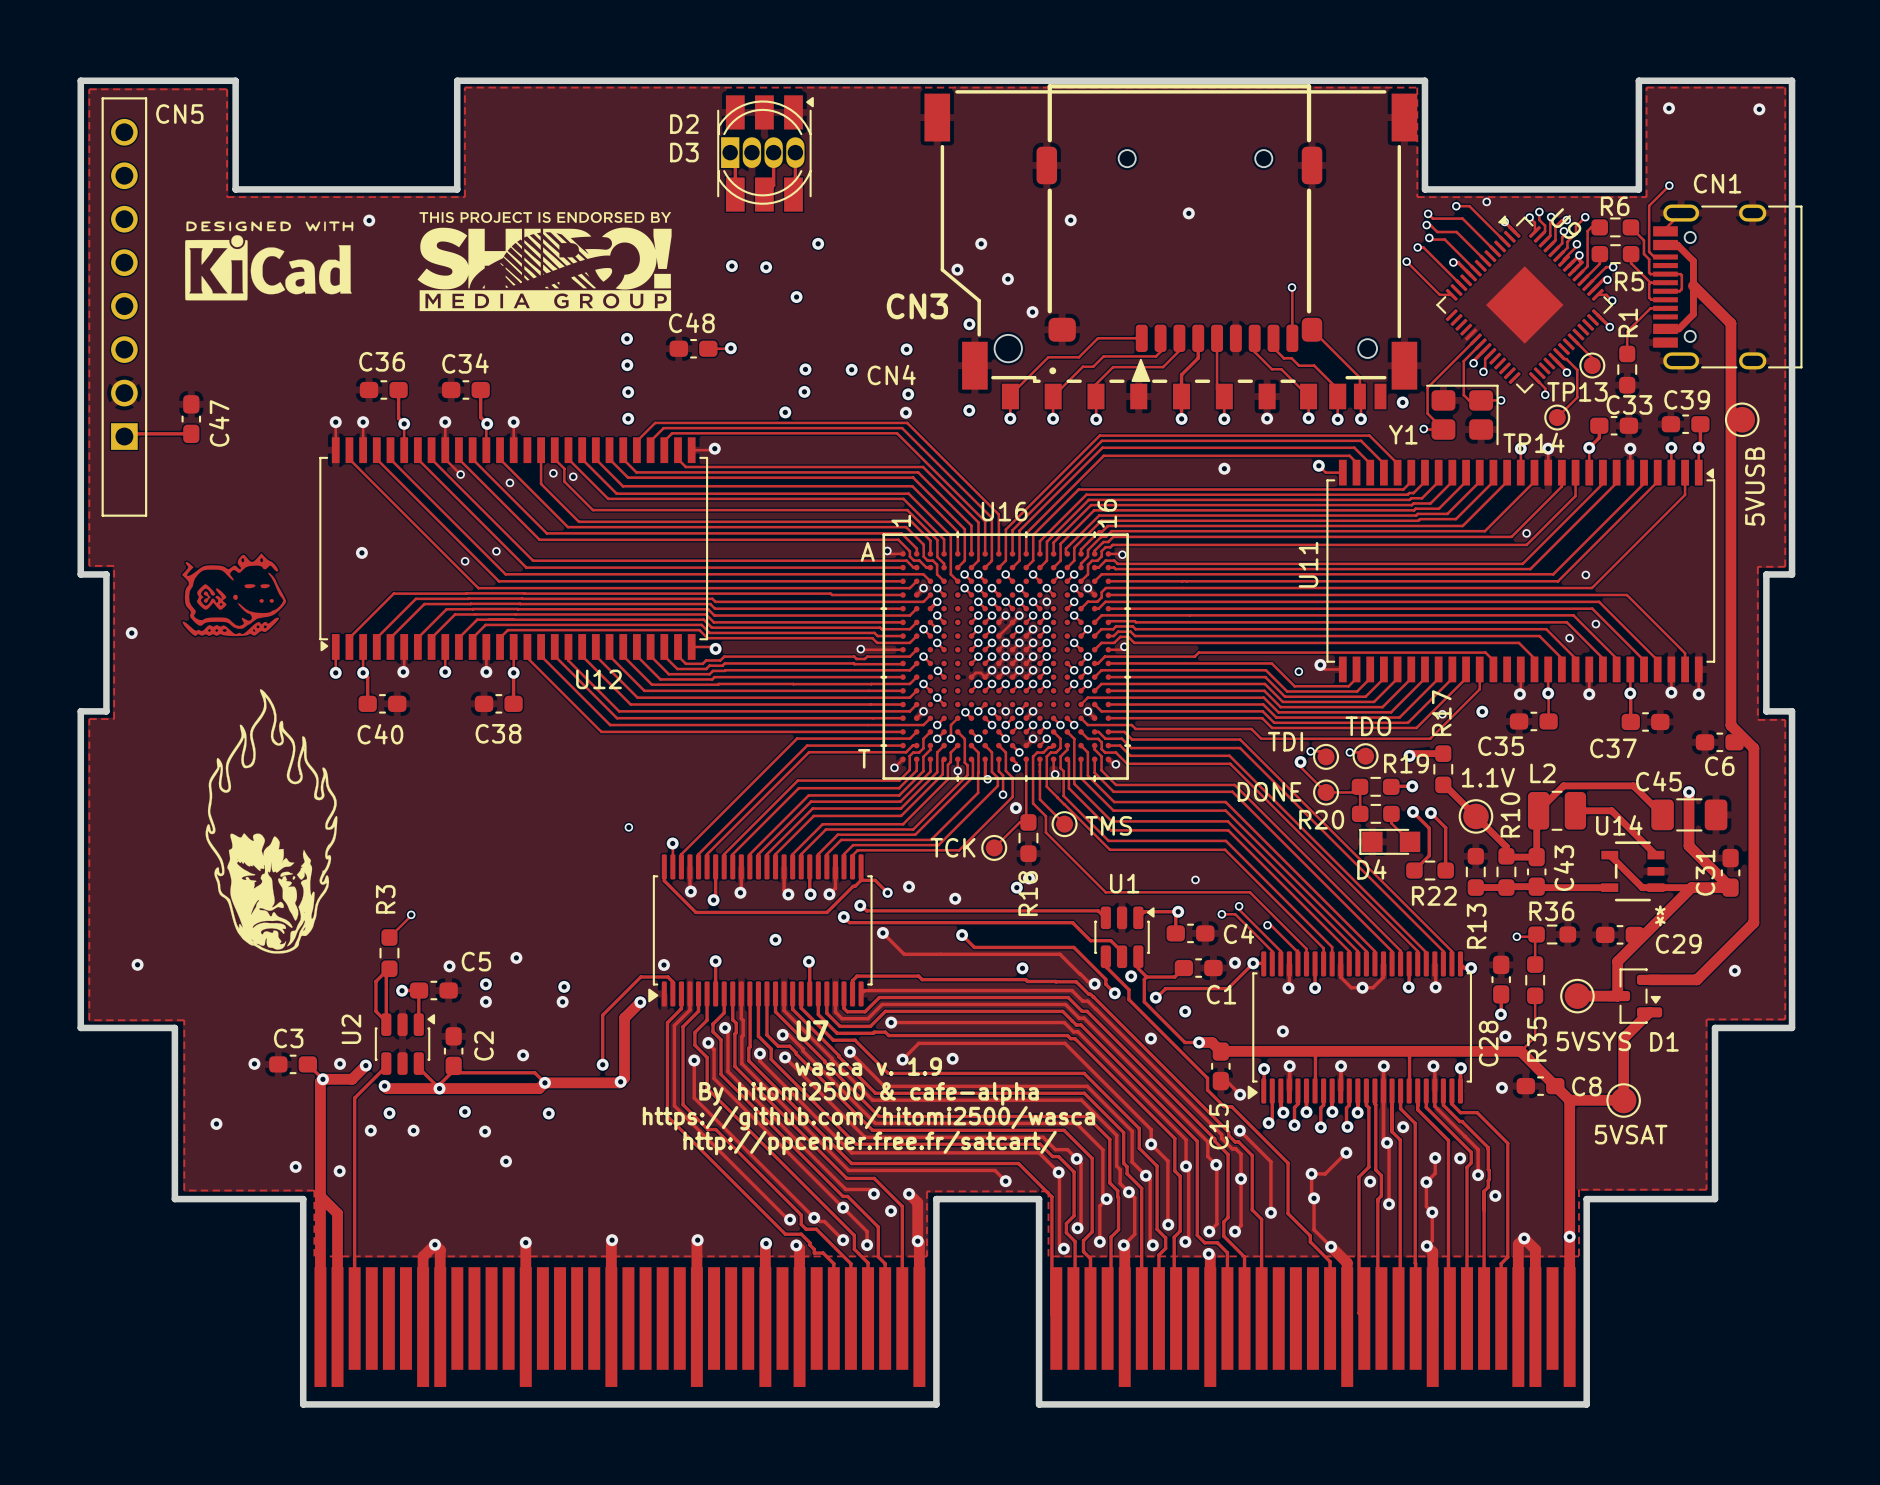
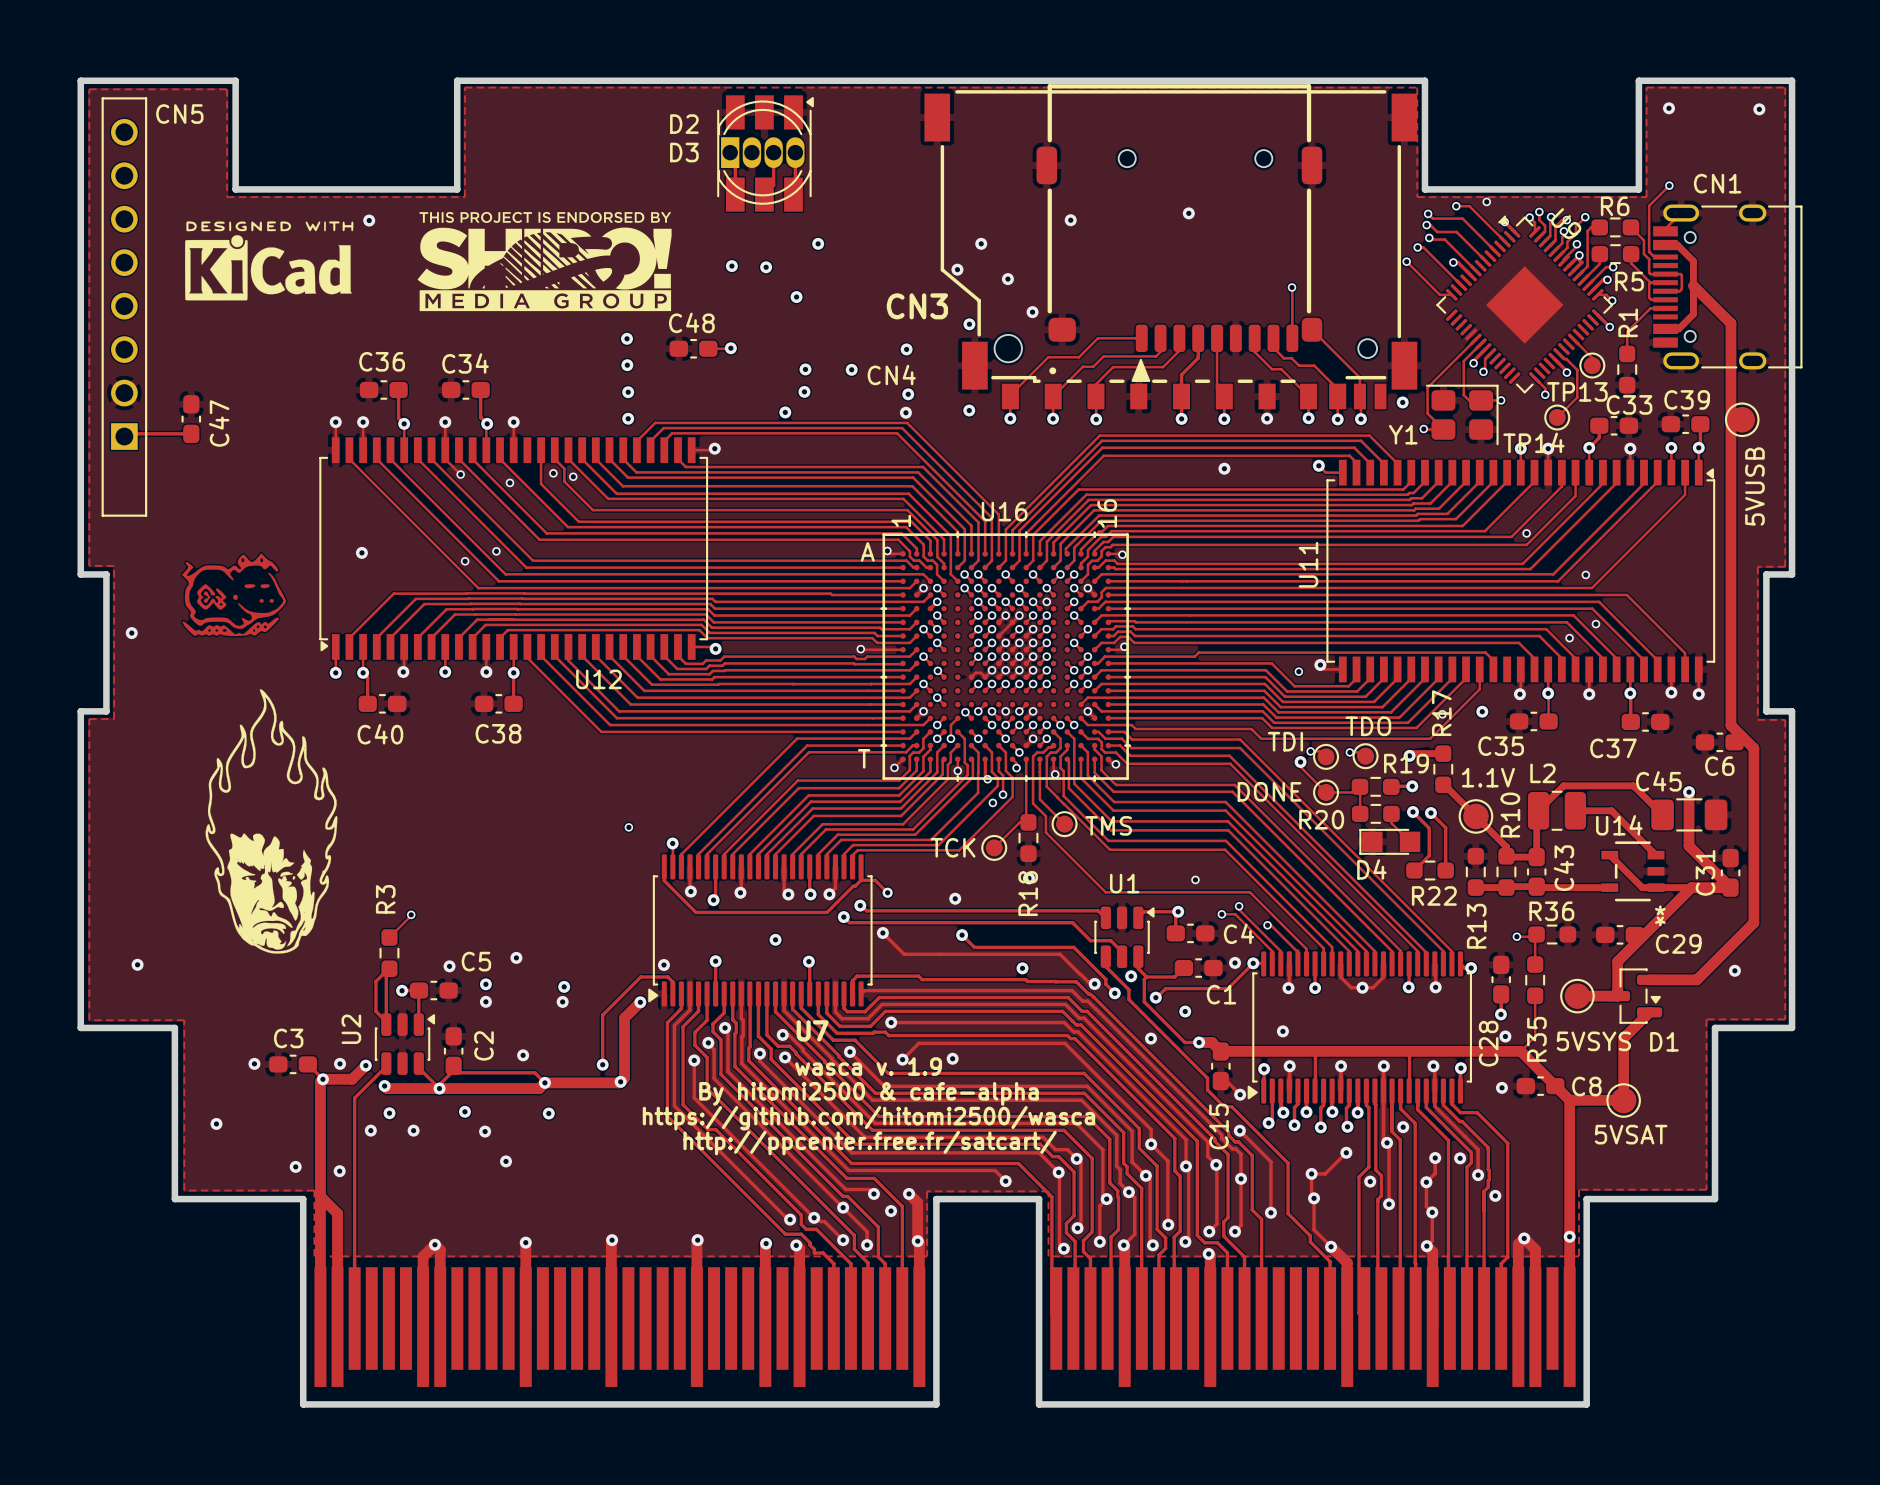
via: none -> (992, 802)
via: (1015, 808) -> none
via: (909, 886) -> none
via: (1016, 887) -> none

